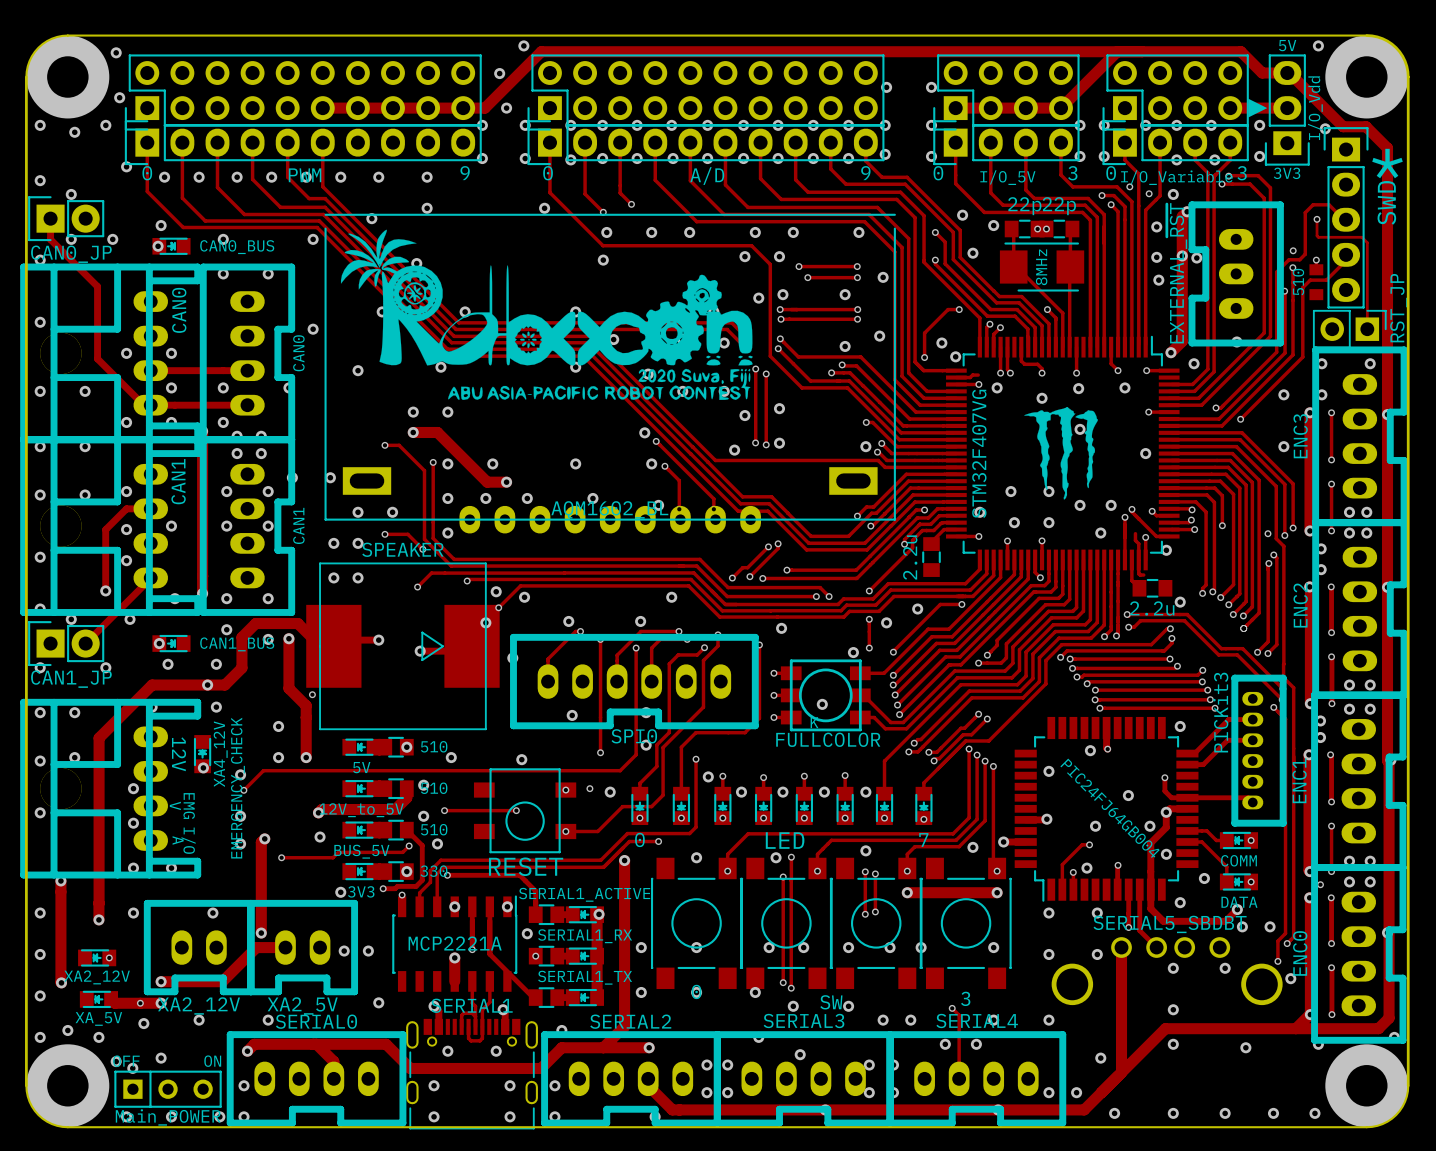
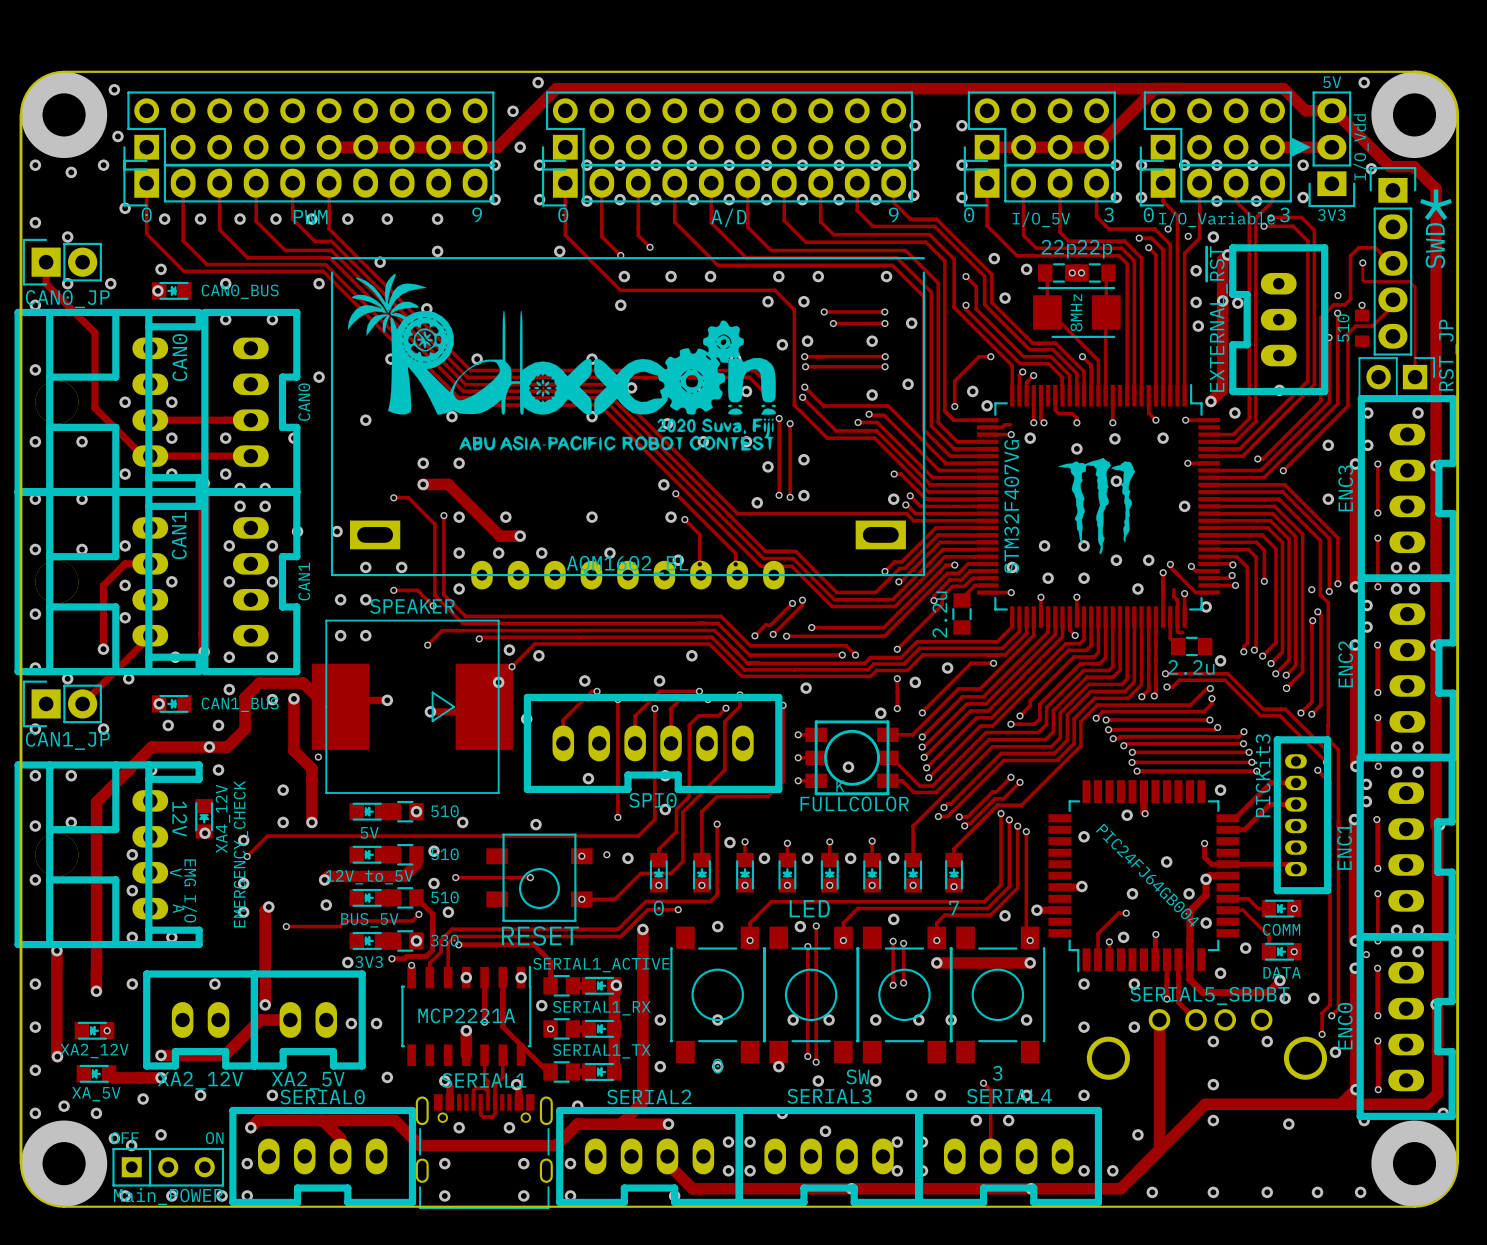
via: (140, 1003) -> none

